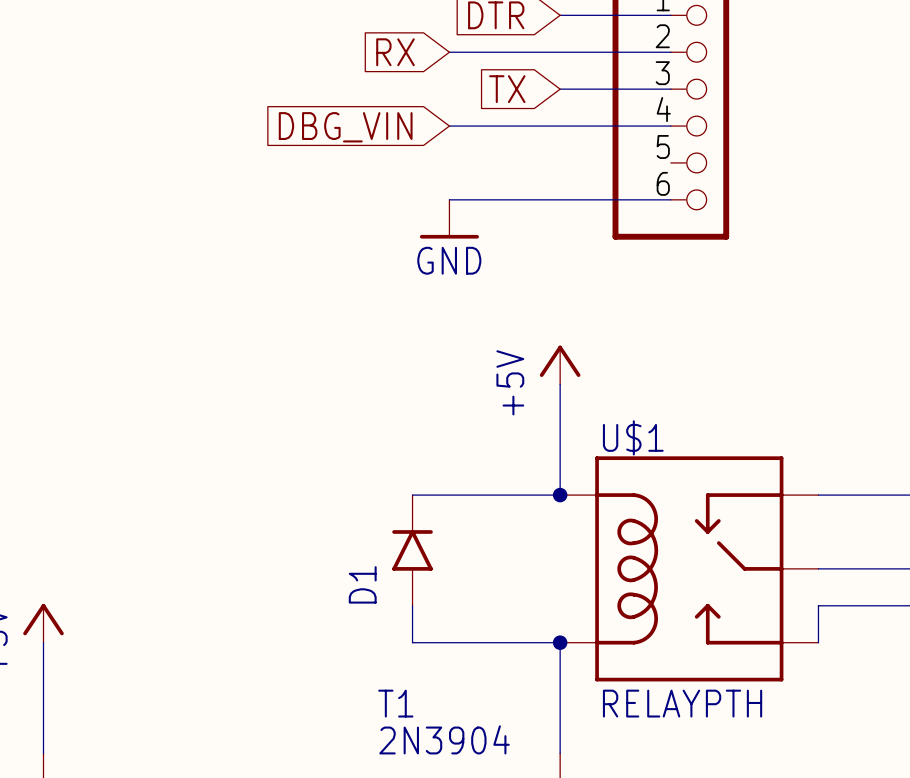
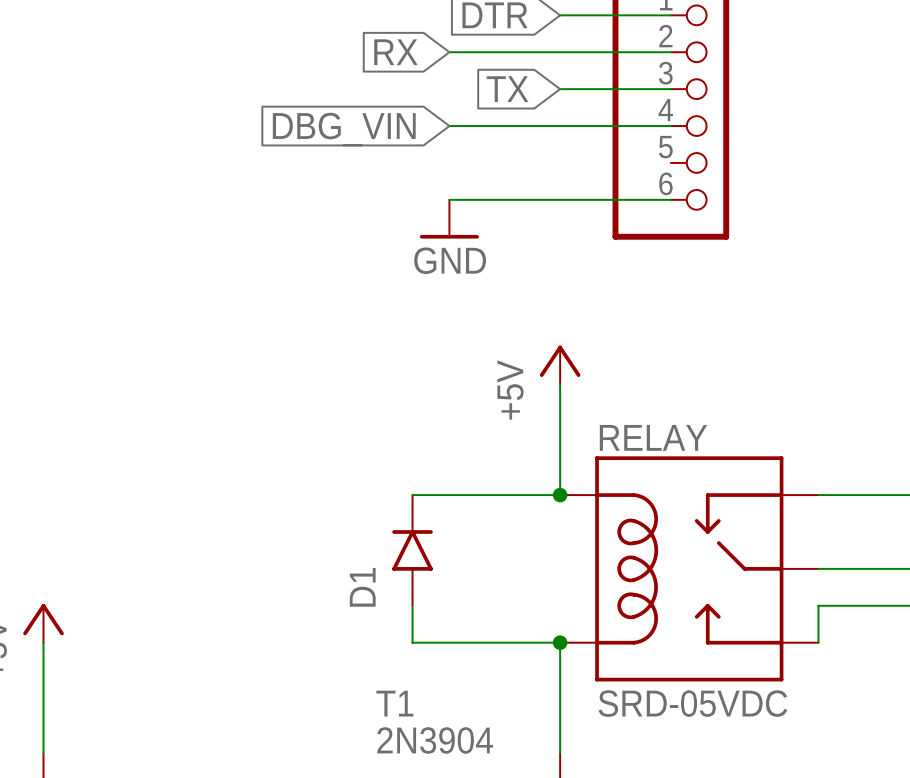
U$1 name: U$1 (633, 437) -> RELAY (653, 437)
U$1 value: RELAYPTH (682, 703) -> SRD-05VDC (692, 703)

